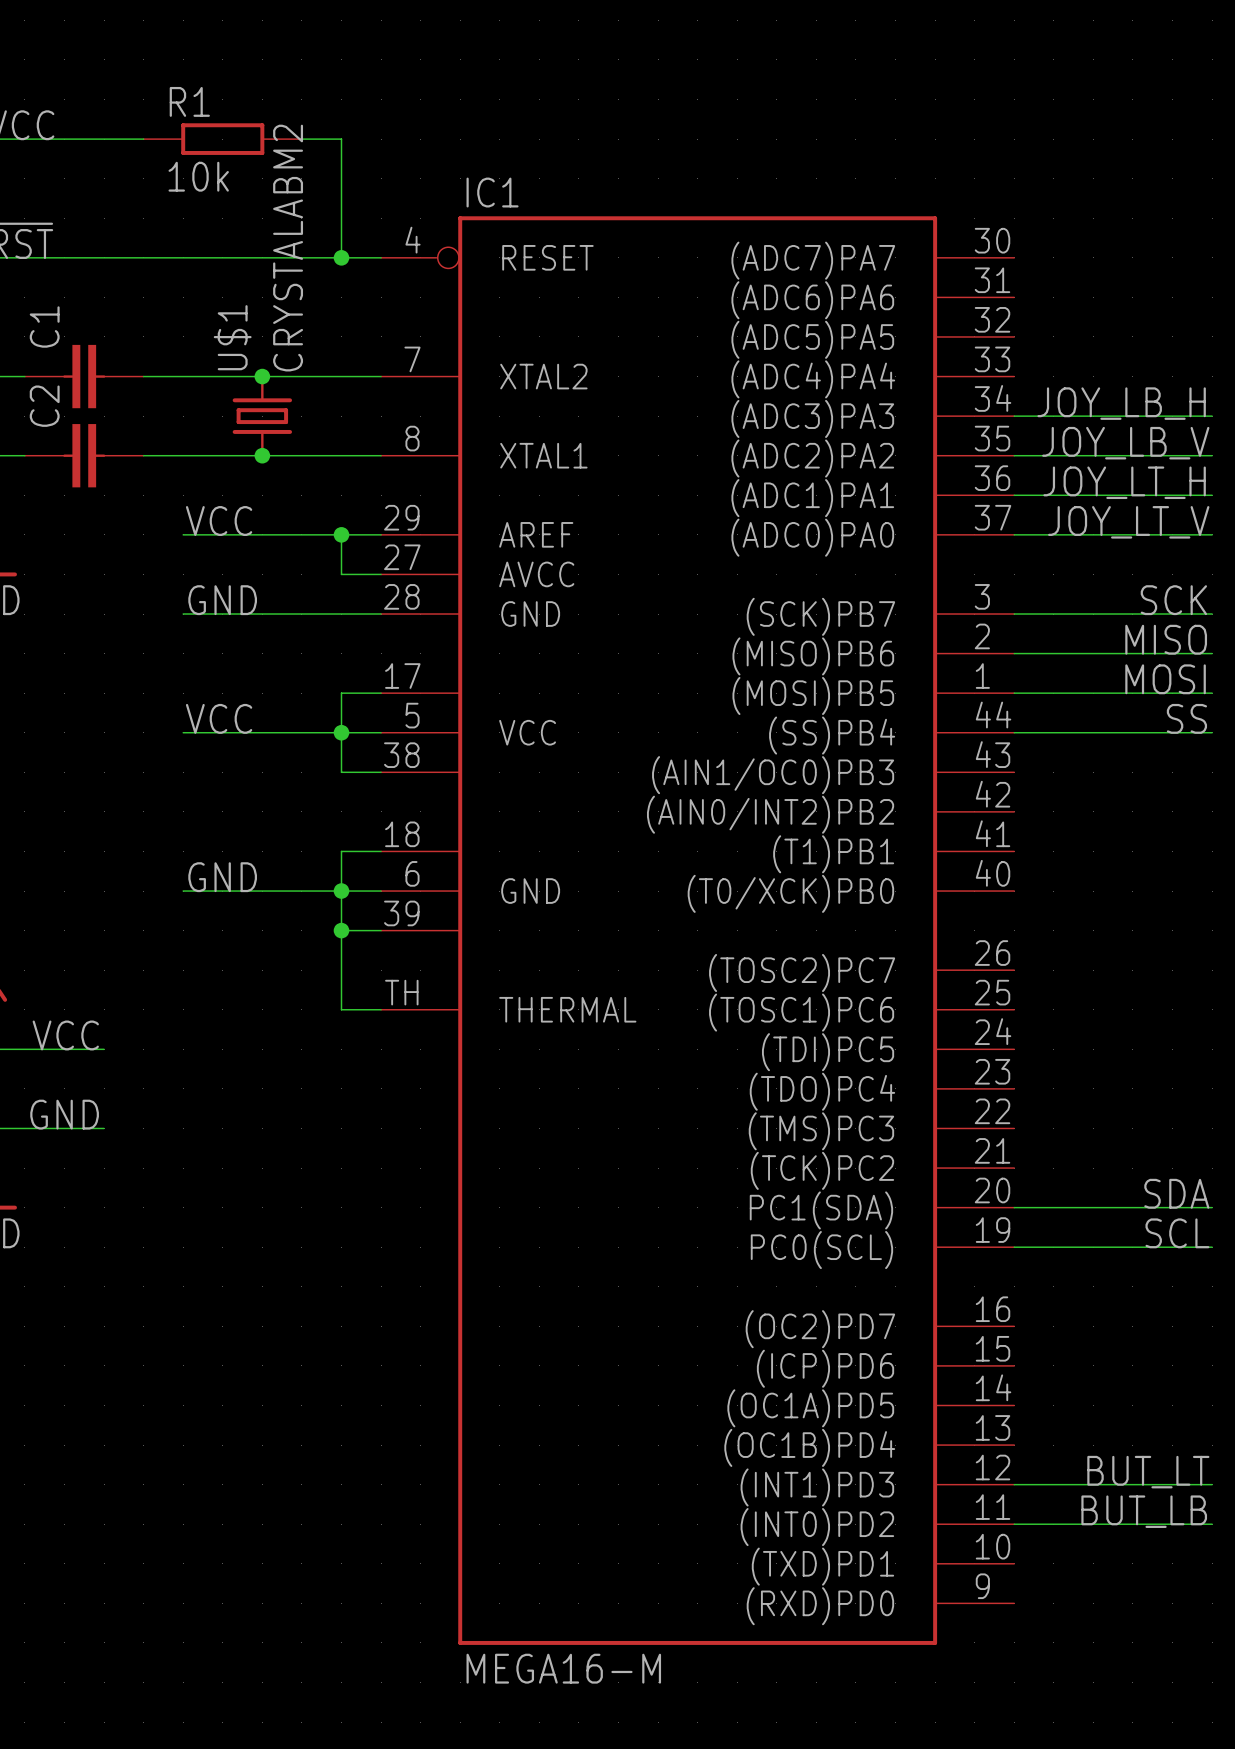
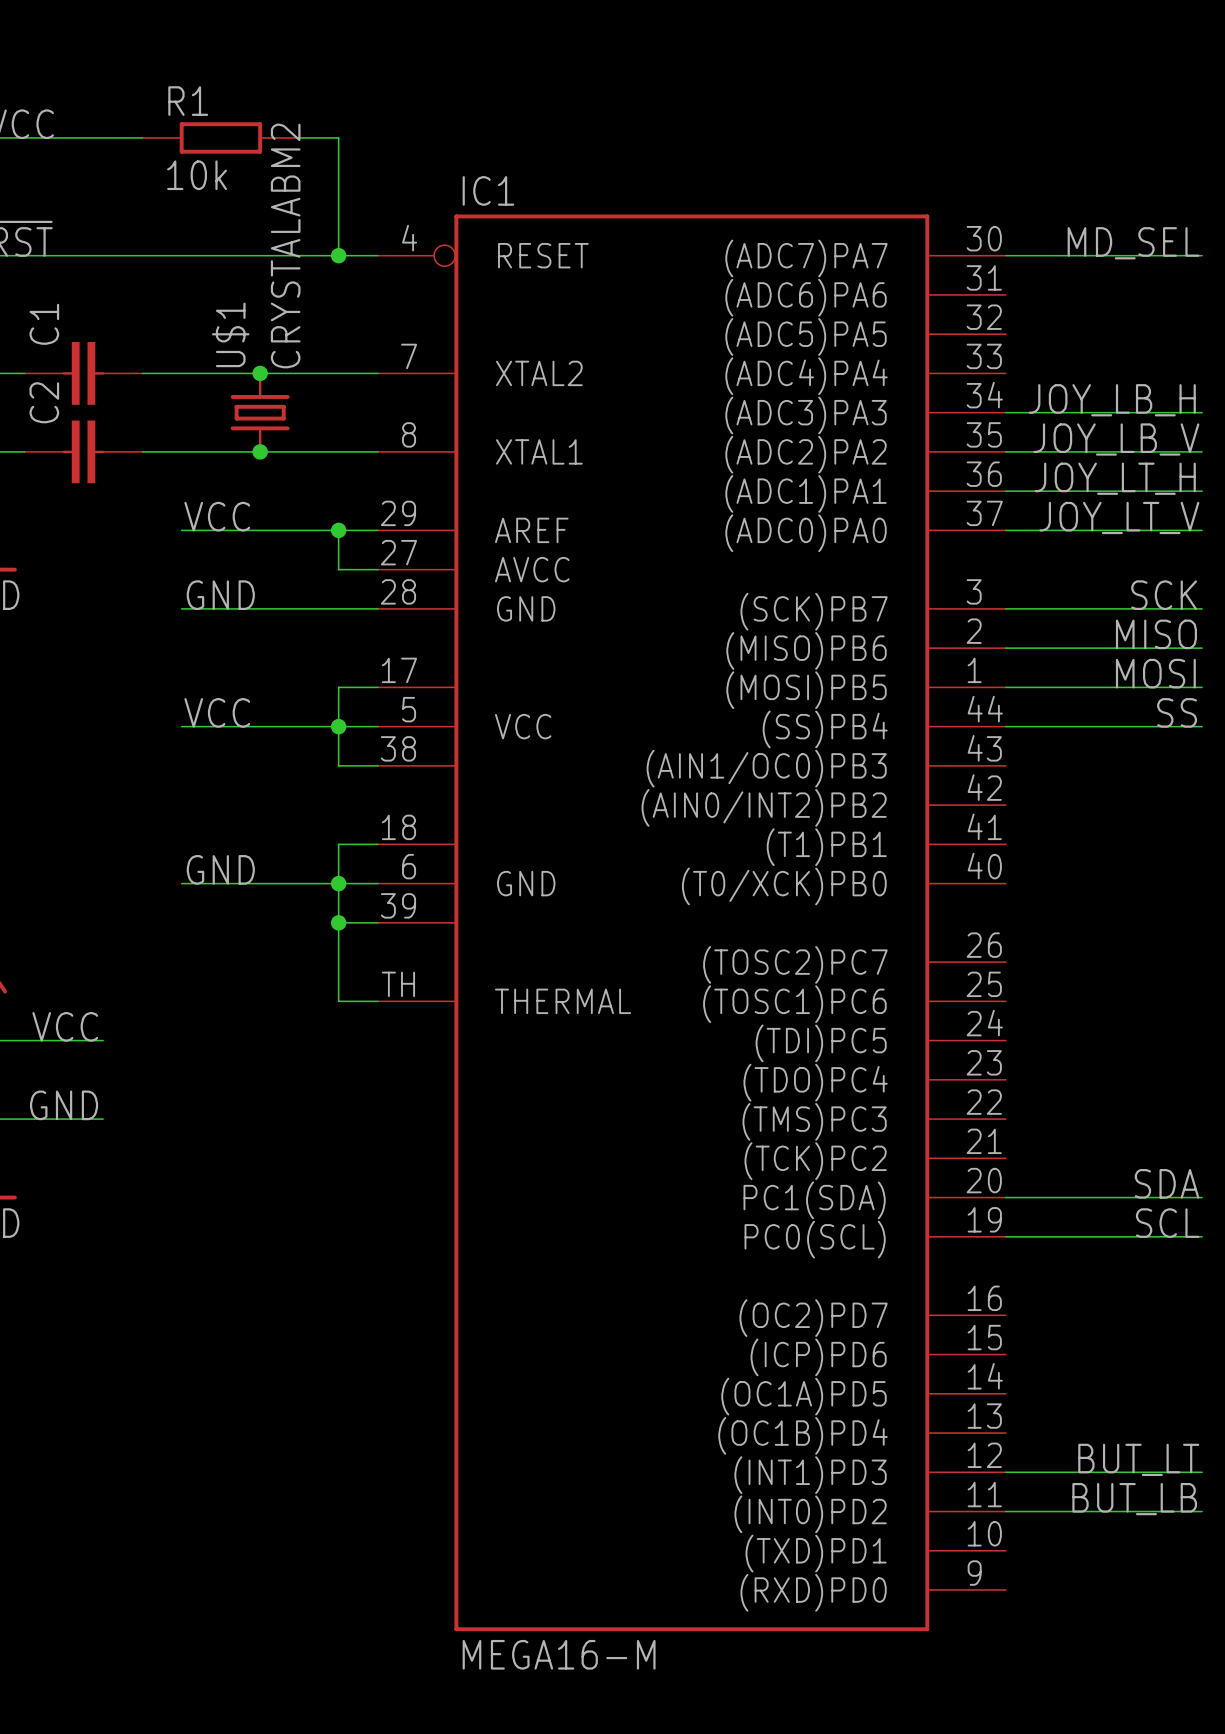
label: none -> MD_SEL (1133, 243)
wire: none -> (1005, 255) (1202, 255)

